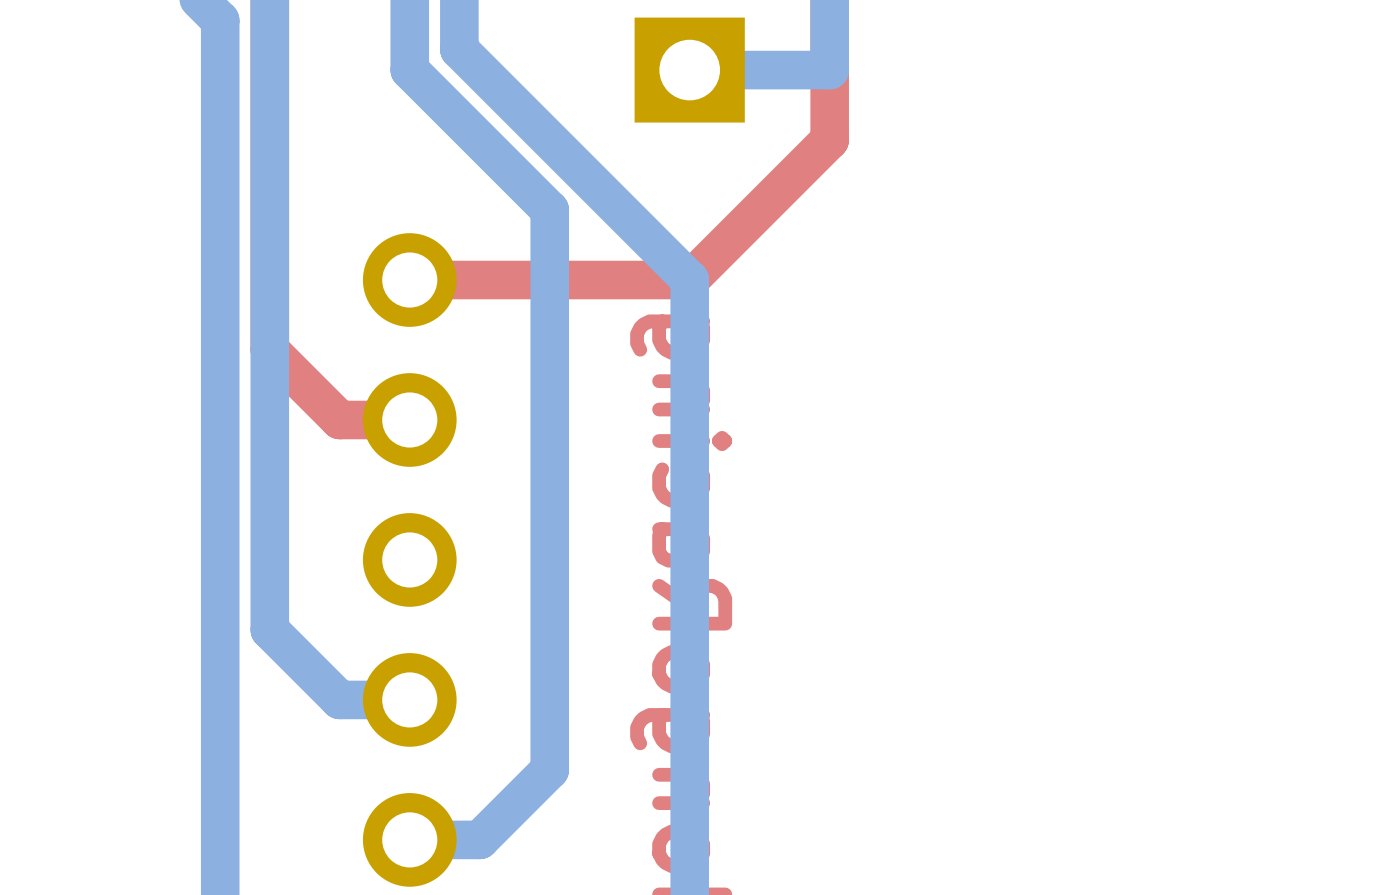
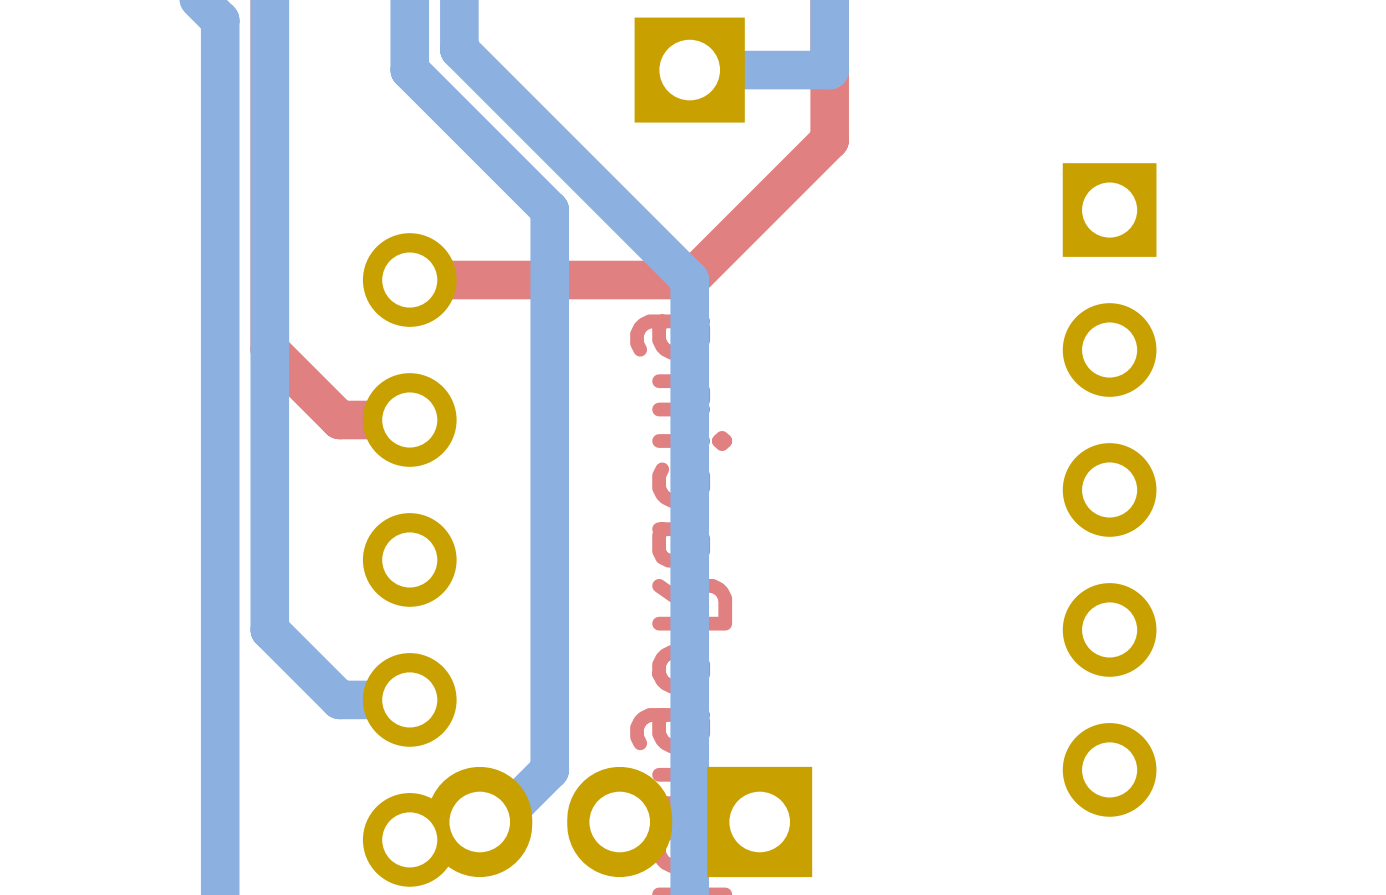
part: none -> (1109, 489)
part: none -> (619, 821)

